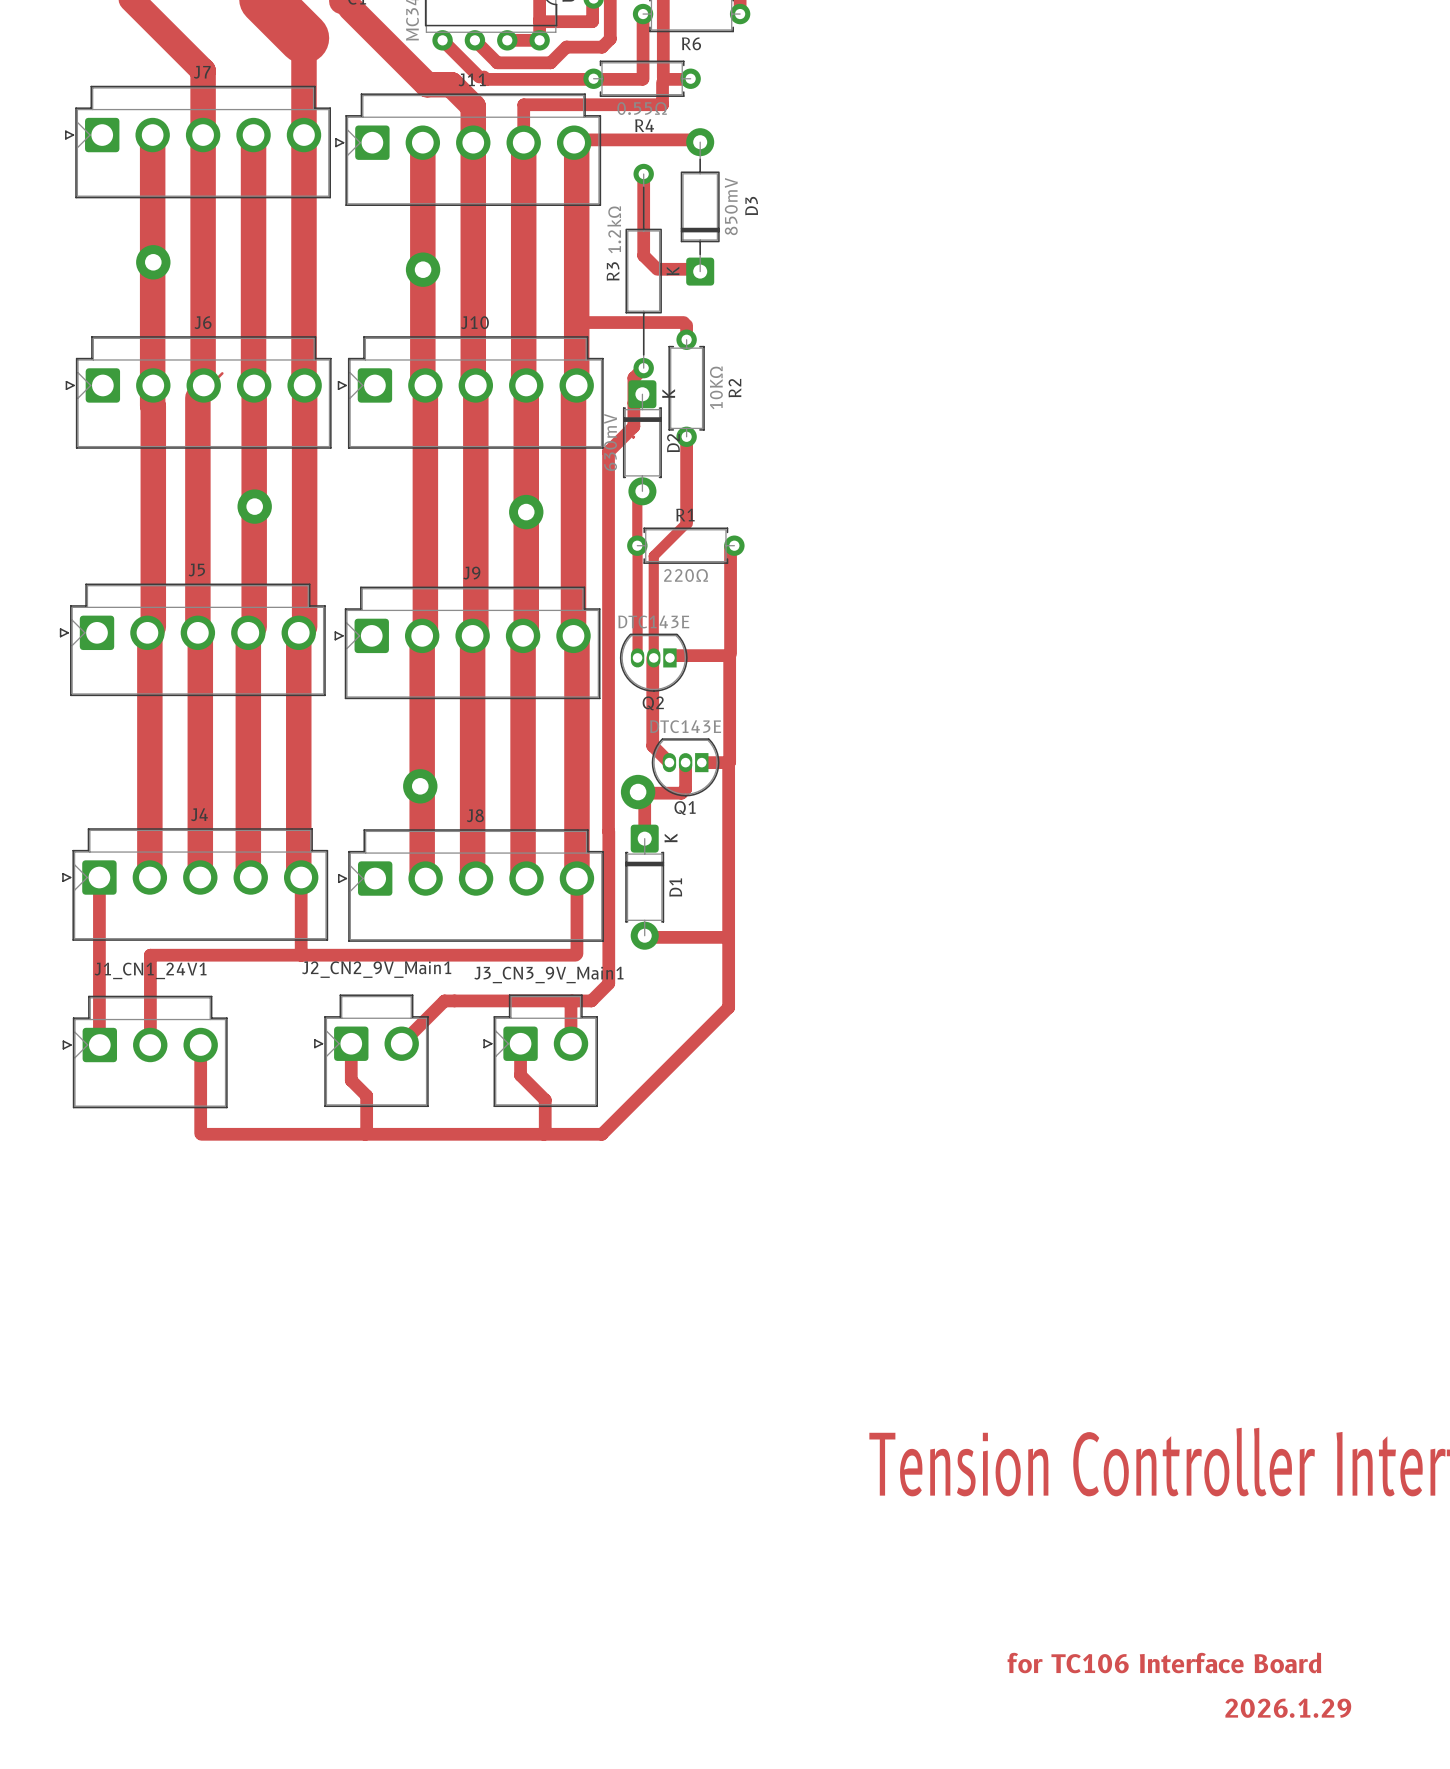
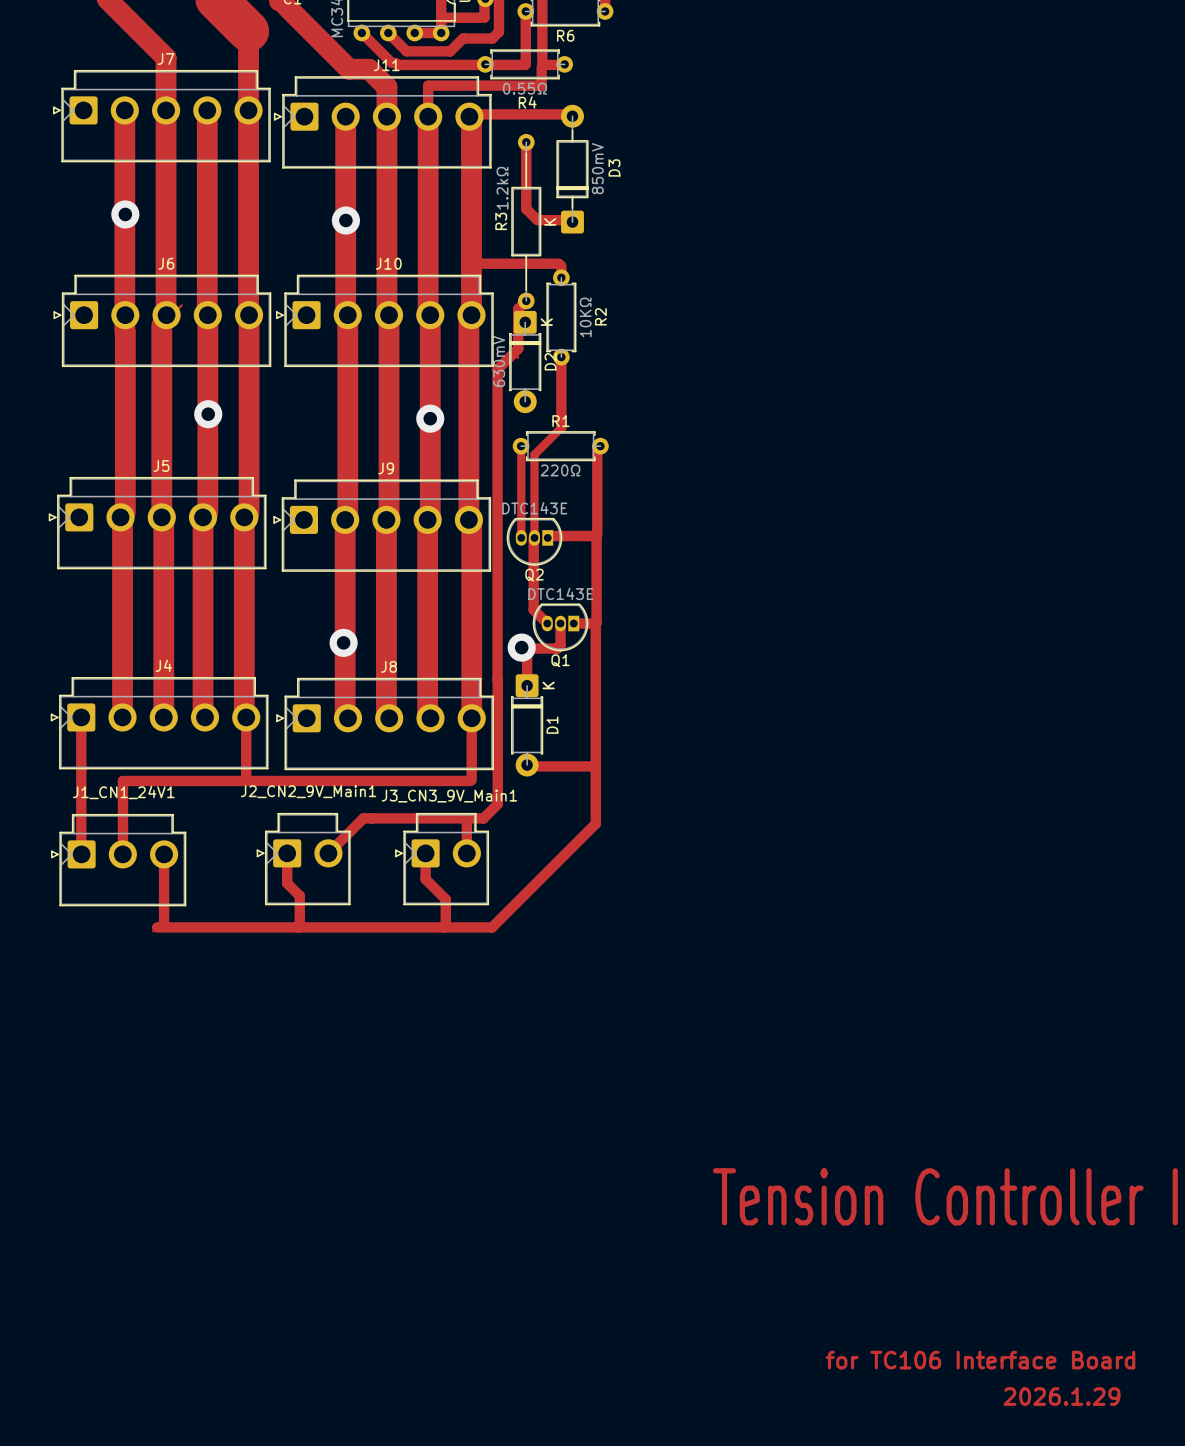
track: (642, 491) (637, 496) (637, 545) -> none
track: none -> (164, 927) (157, 927) (153, 931)

